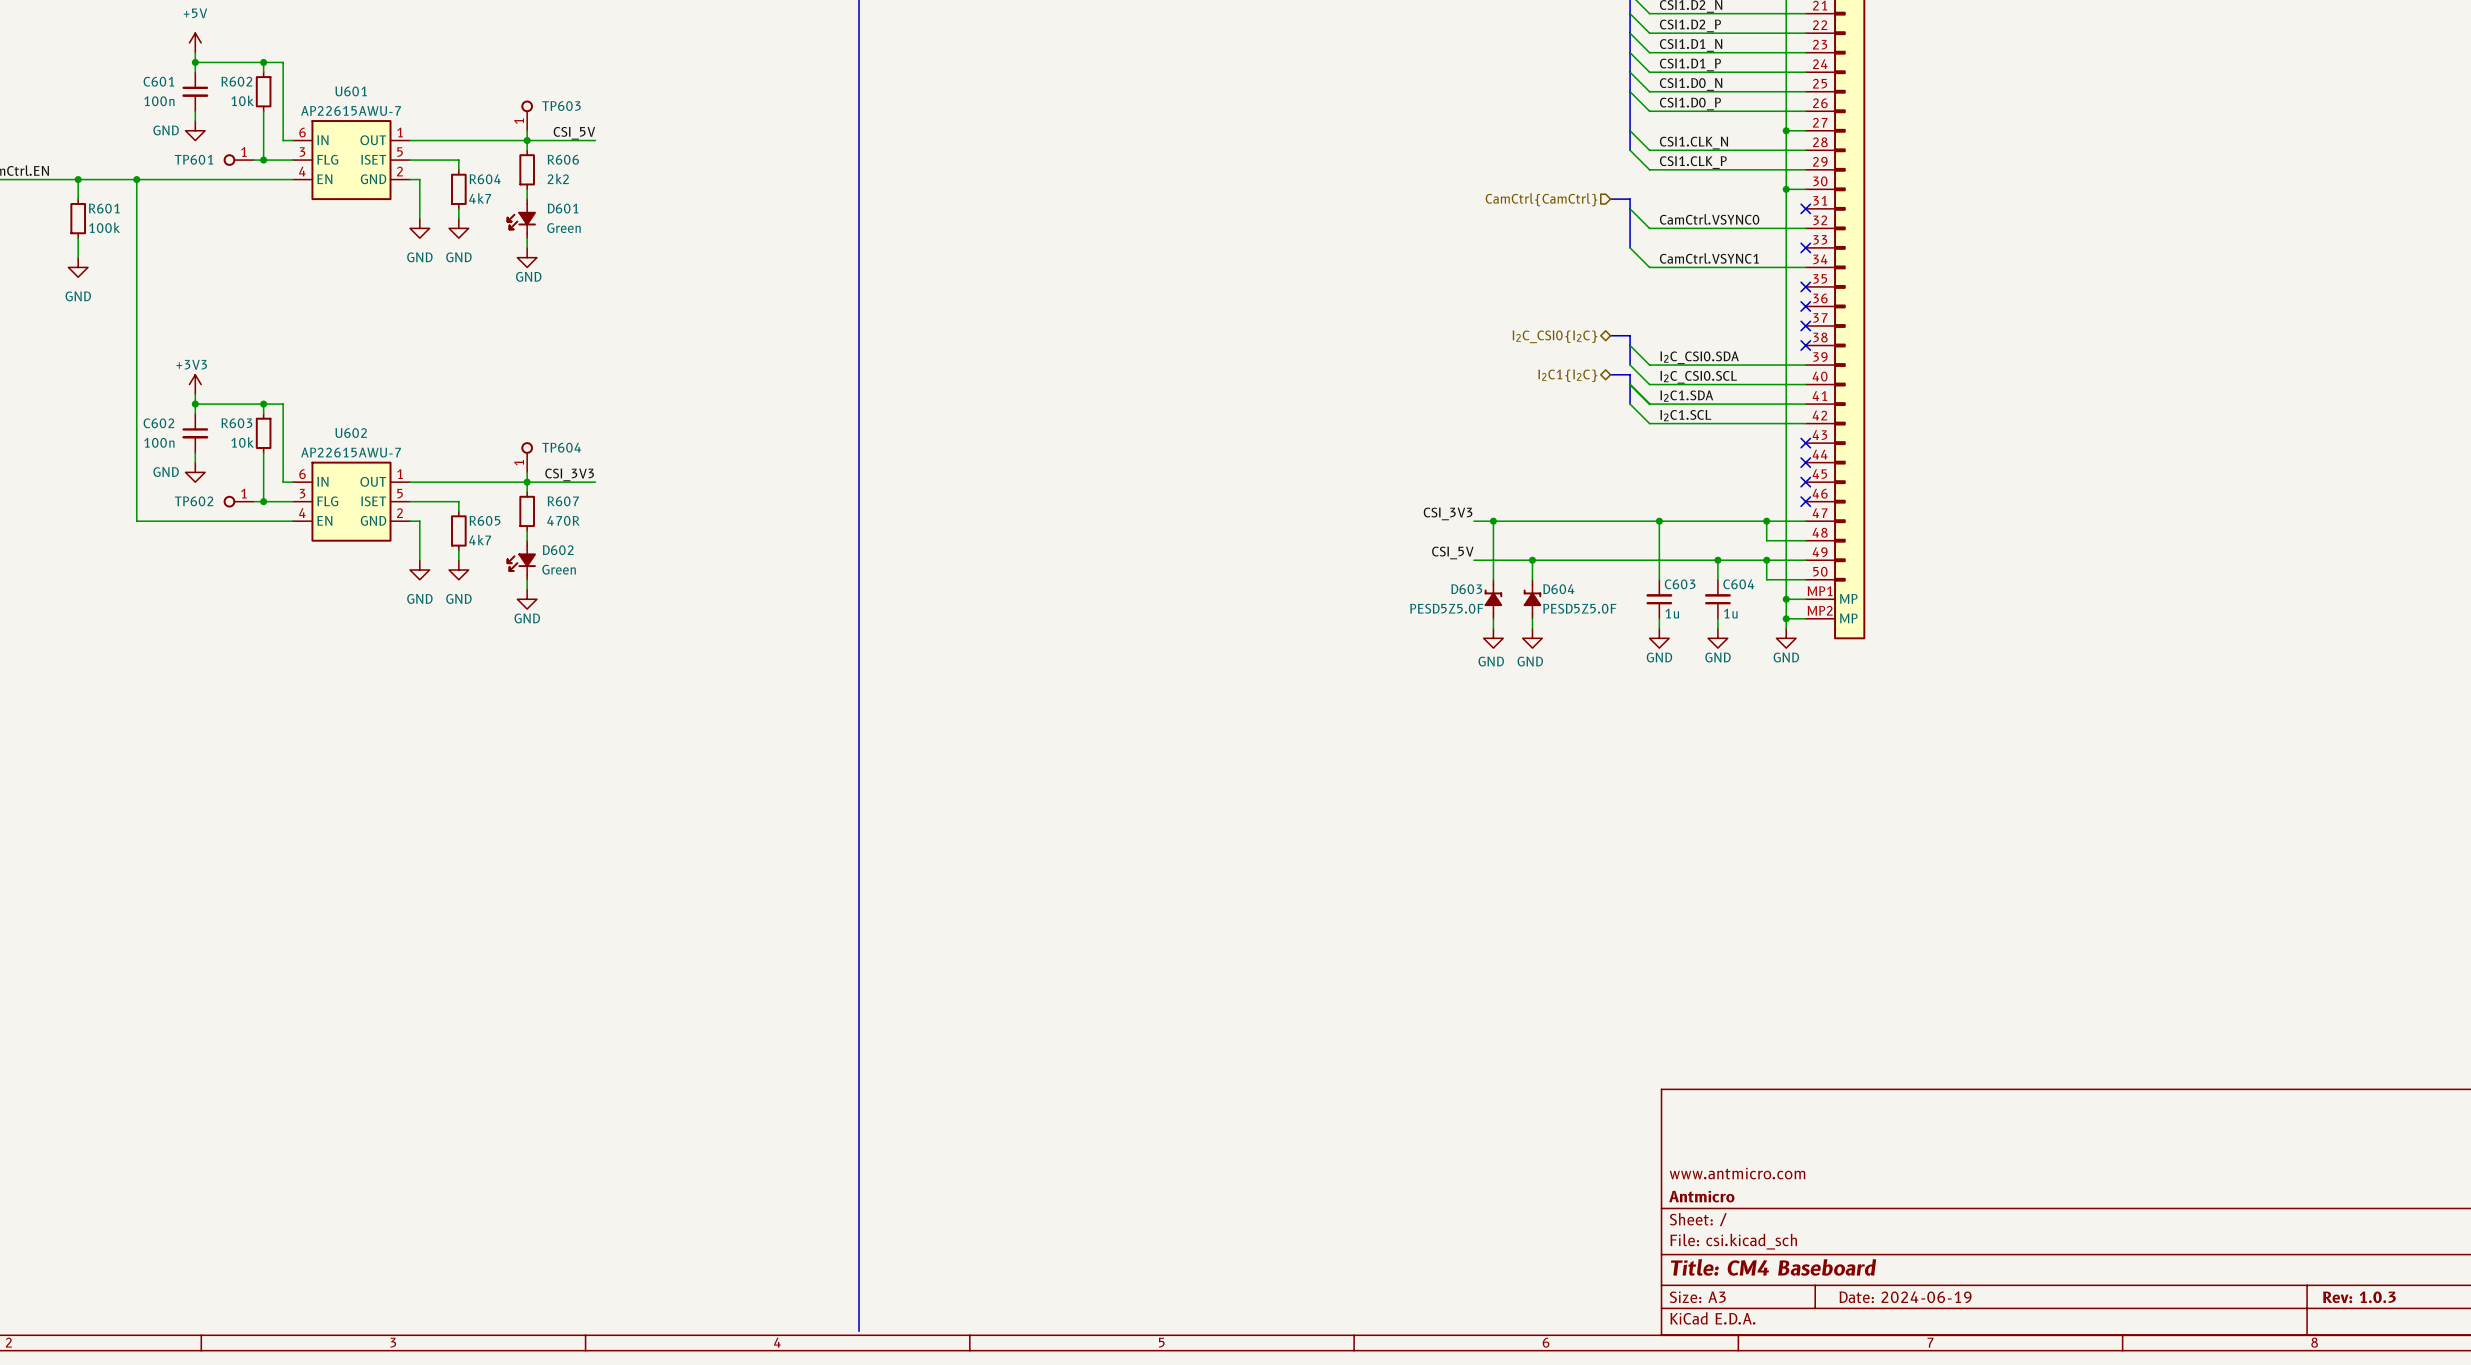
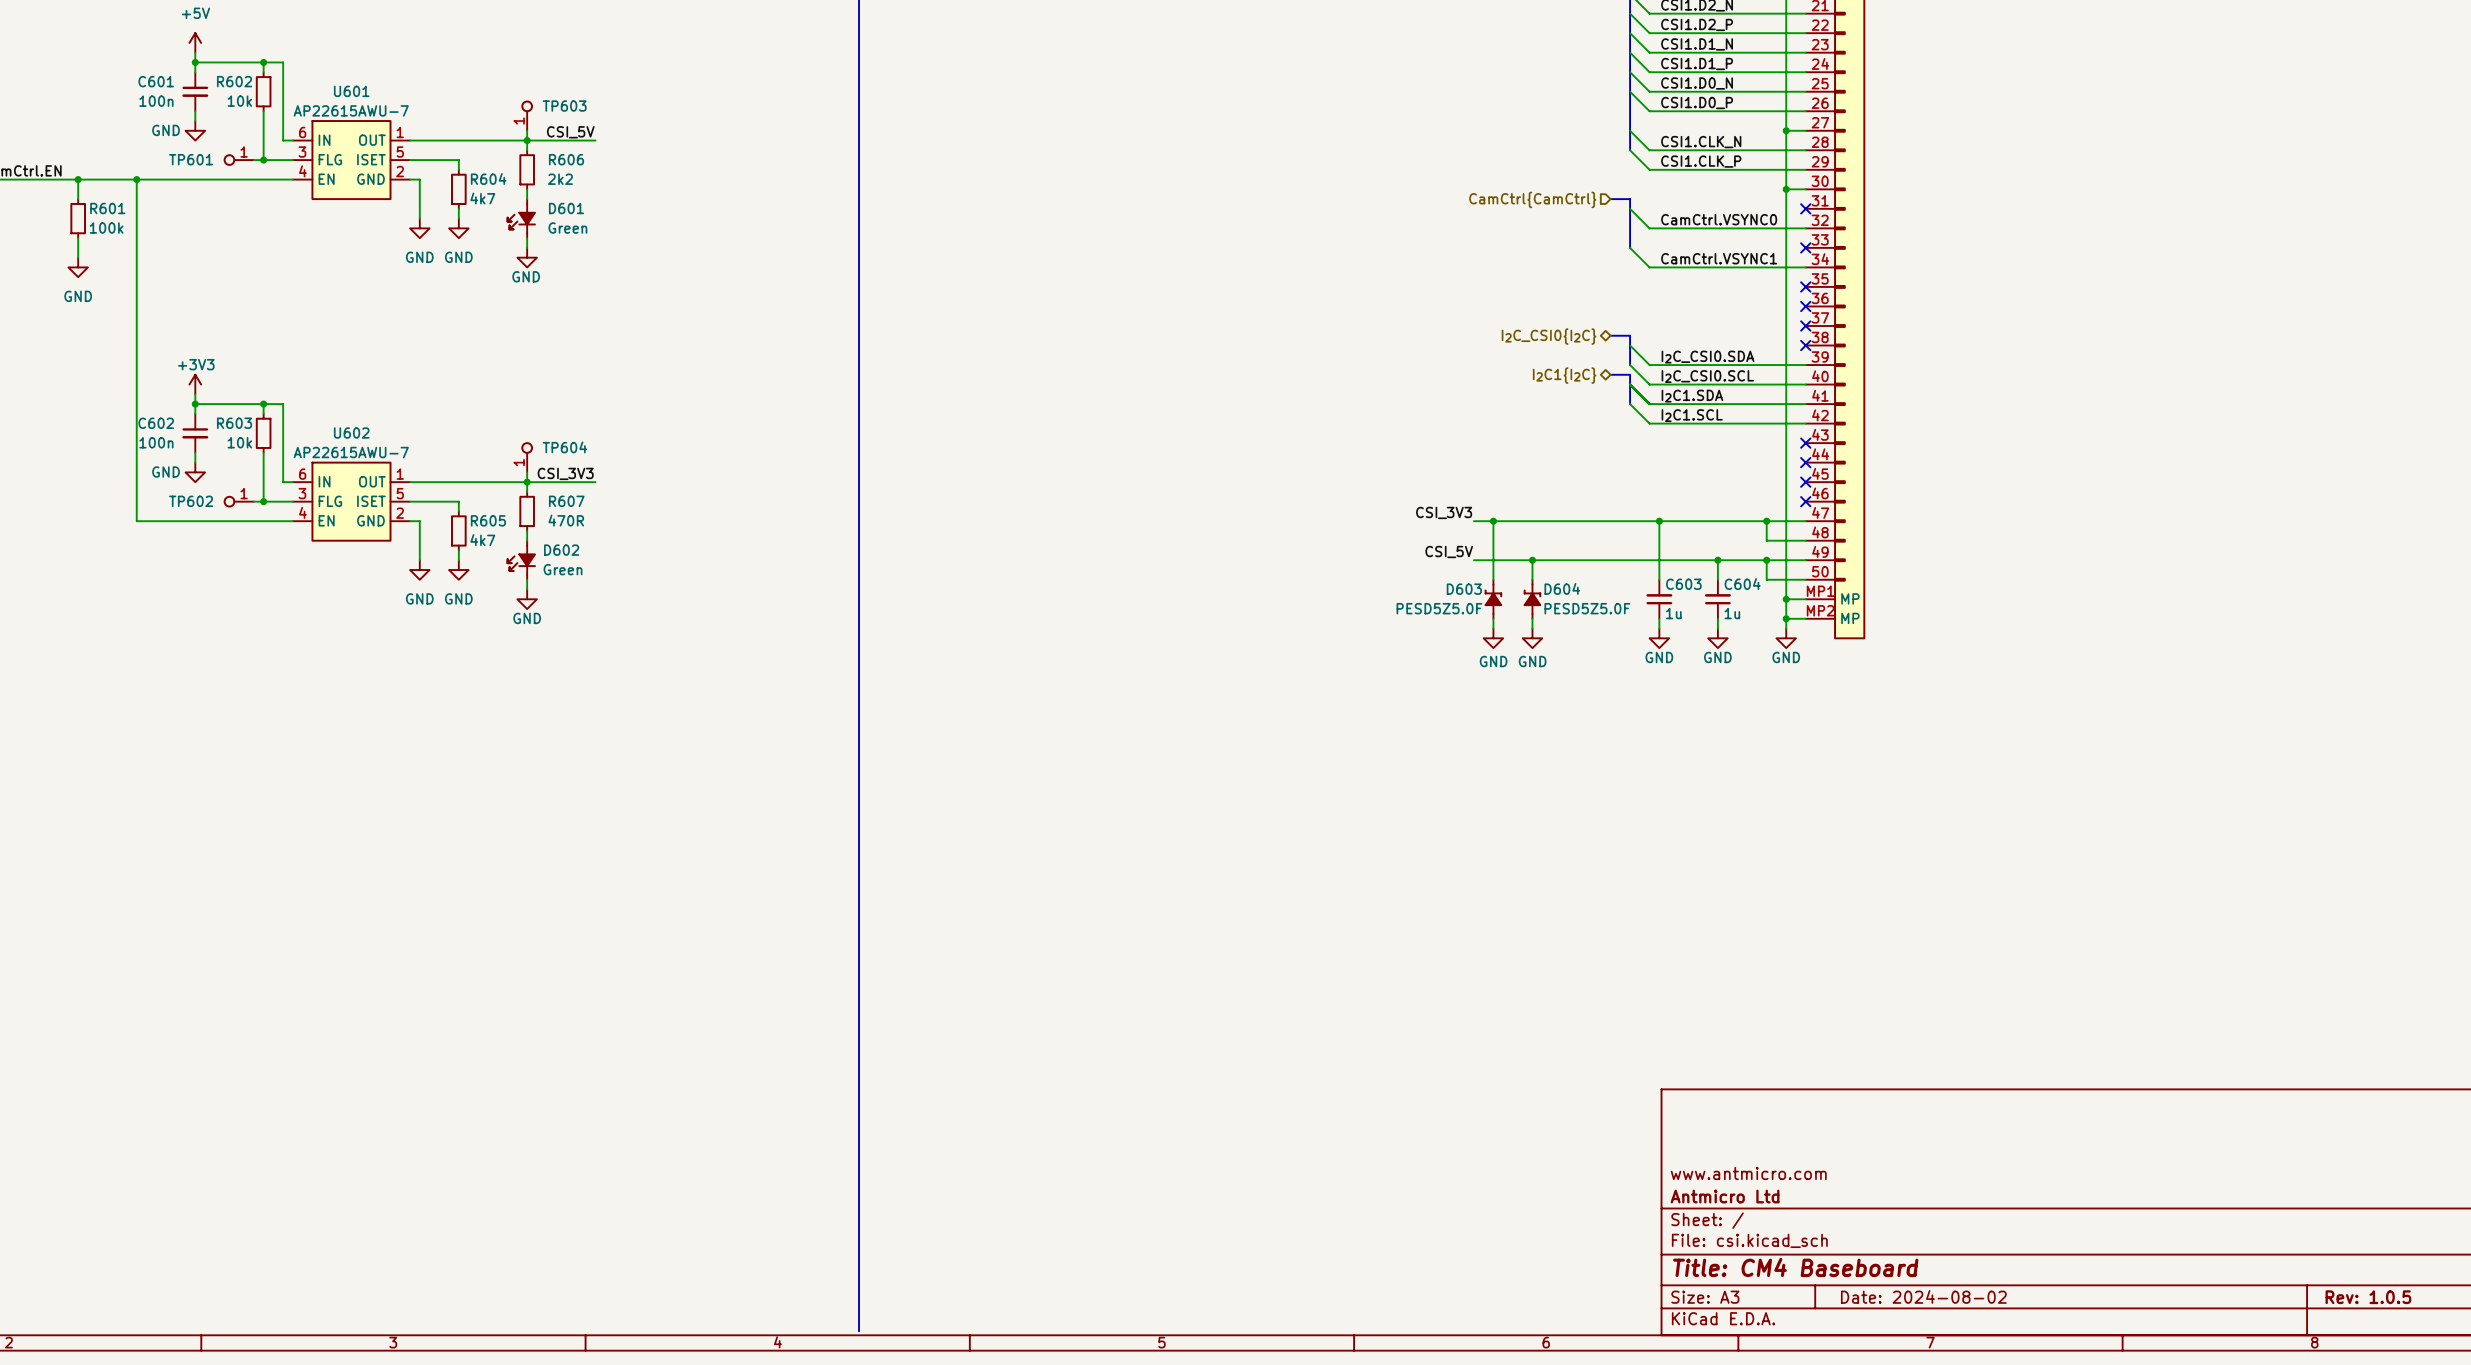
title block: Antmicro (1701, 1196) -> Antmicro Ltd (1725, 1196)
title block: Date: 2024-06-19 (1905, 1297) -> Date: 2024-08-02 (1923, 1296)
title block: Rev: 1.0.3 (2359, 1297) -> Rev: 1.0.5 (2368, 1297)

